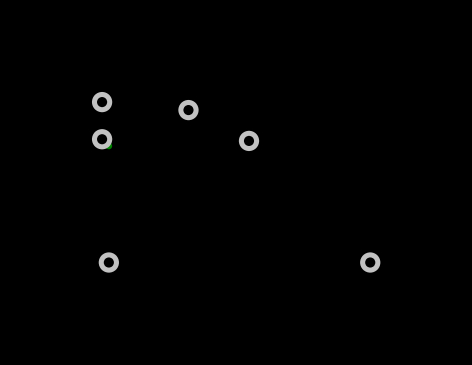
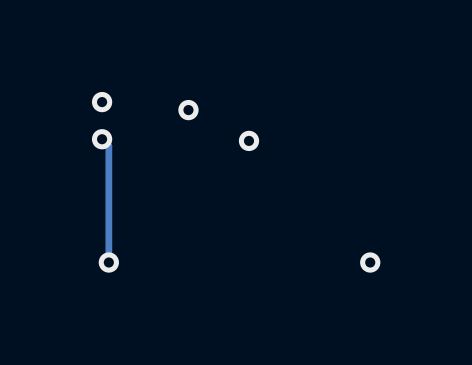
track: none -> (108, 145) (108, 262)

